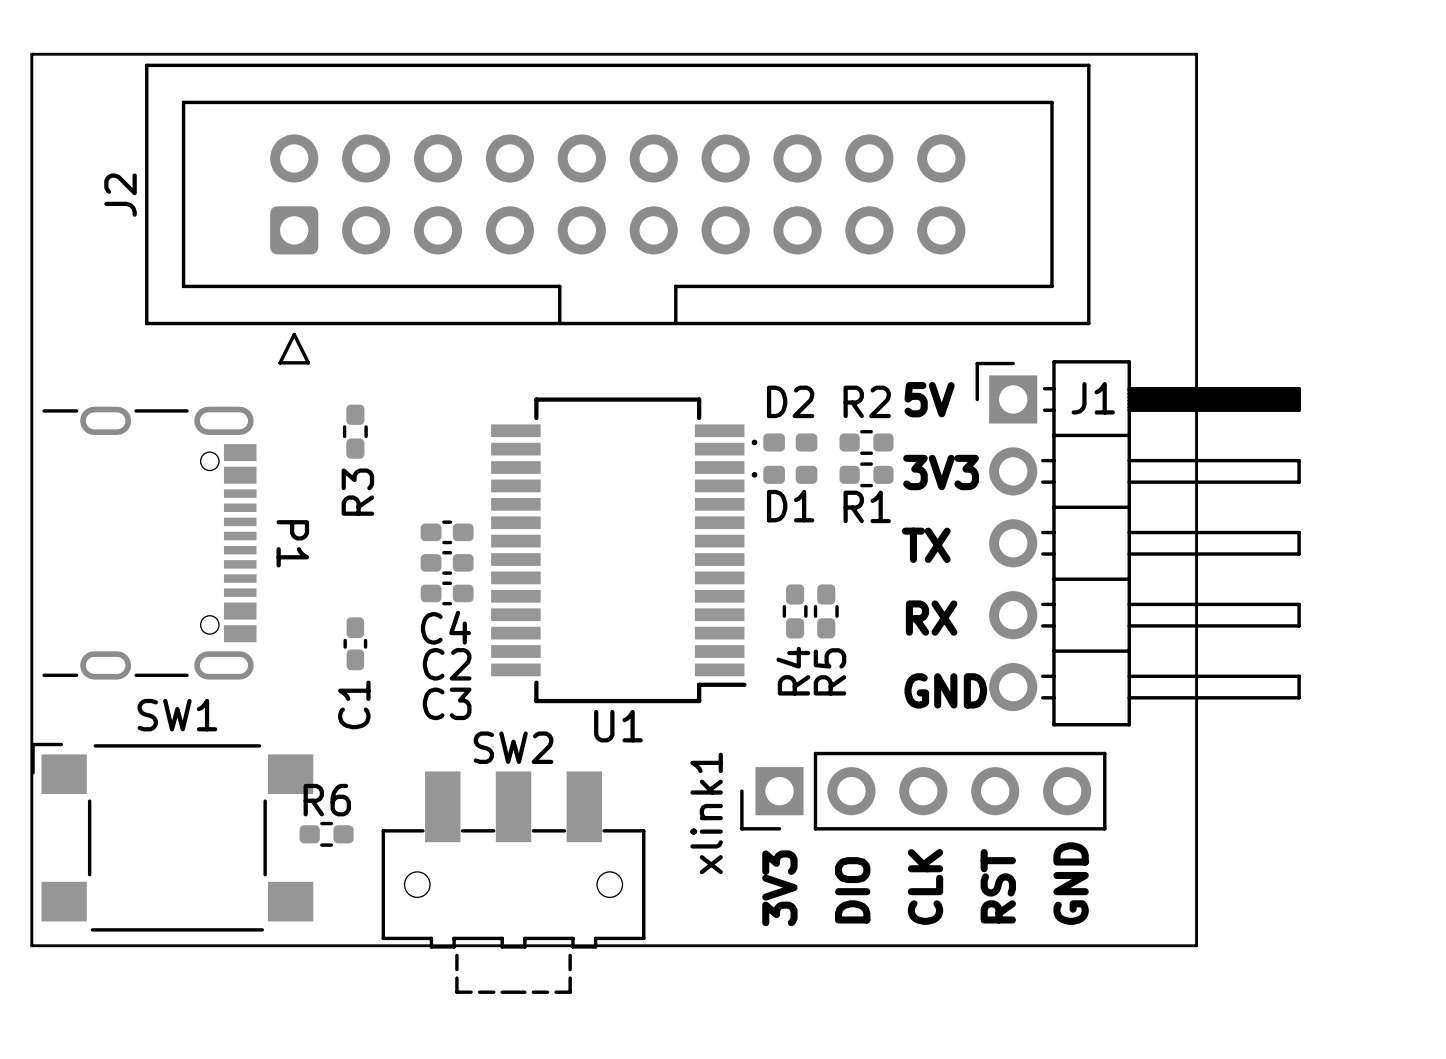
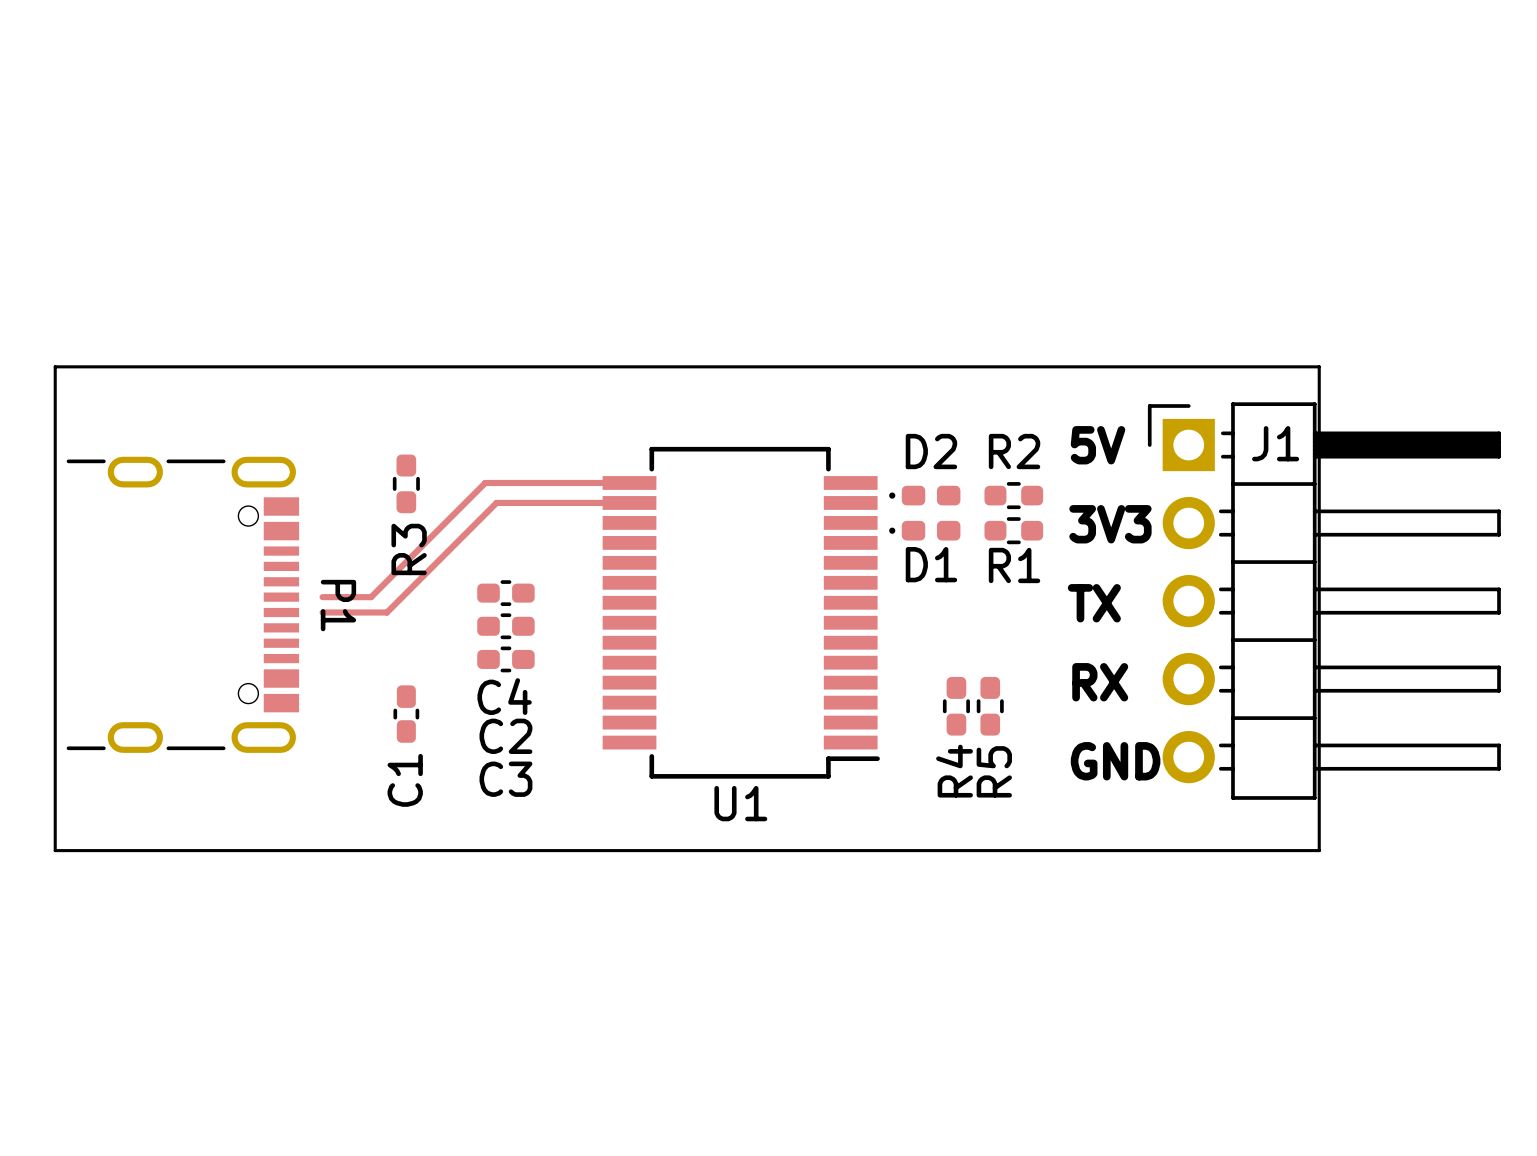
J2: (617, 214) -> none
board edge: (31, 323) (31, 54) (1196, 54) (1196, 323) -> (55, 366) (1319, 366)
text position: 5V (929, 399) -> 5V (1098, 445)
track: none -> (629, 482) (485, 482) (371, 597) (322, 597)
D2 position: (784, 442) -> (924, 495)
R2 position: (866, 442) -> (1013, 495)
track: none -> (629, 502) (496, 502) (386, 612) (322, 612)
text position: 3V3 (941, 472) -> 3V3 (1110, 524)
D1 position: (784, 474) -> (924, 530)
R1 position: (866, 474) -> (1013, 530)
J1 position: (1138, 543) -> (1324, 601)
text position: TX (926, 545) -> TX (1094, 603)
U1 position: (618, 550) -> (741, 612)
R4 position: (795, 611) -> (956, 706)
R5 position: (826, 611) -> (990, 706)
text position: RX (931, 618) -> RX (1100, 682)
text position: GND (945, 690) -> GND (1115, 761)
board edge: (31, 769) (31, 945) (1196, 945) (1196, 769) -> (55, 850) (1319, 850)
xlink1: (923, 791) -> none
R6: (326, 834) -> none
SW1: (172, 837) -> none
SW2: (513, 882) -> none
text: GND (1071, 883) -> none
text: CLK (925, 886) -> none
text: RST (998, 886) -> none
text: 3V3 (779, 888) -> none
text: DIO (852, 890) -> none

